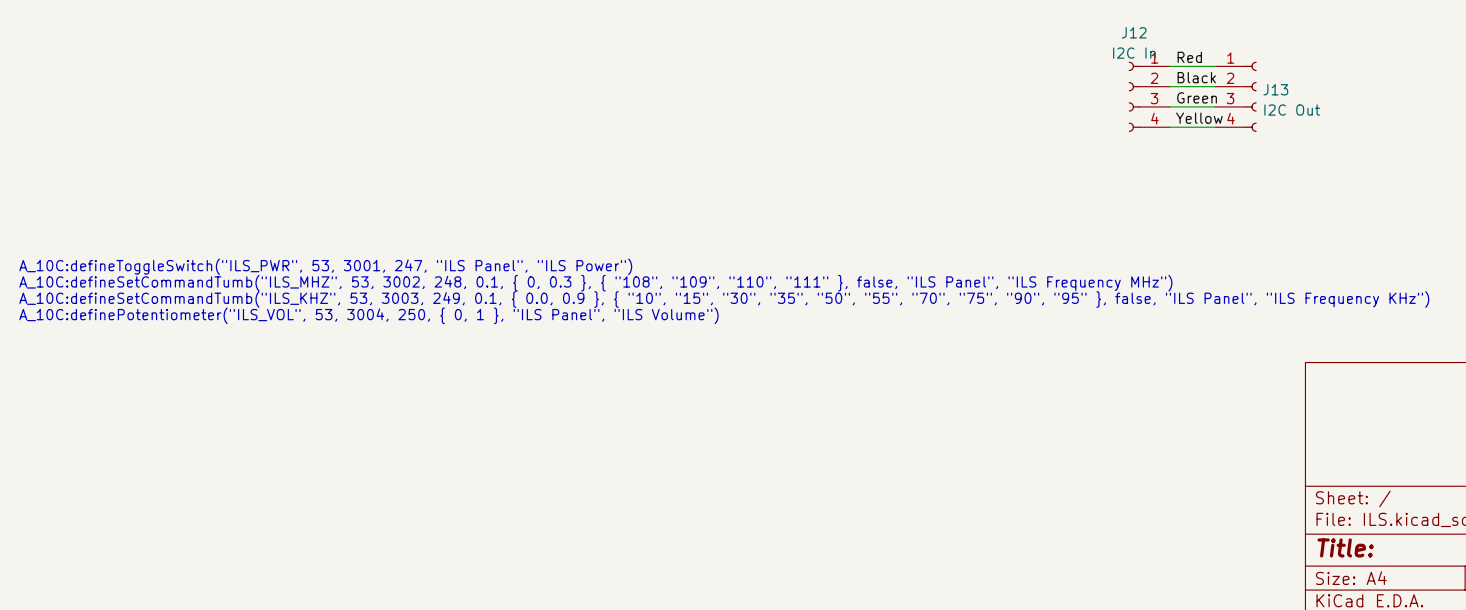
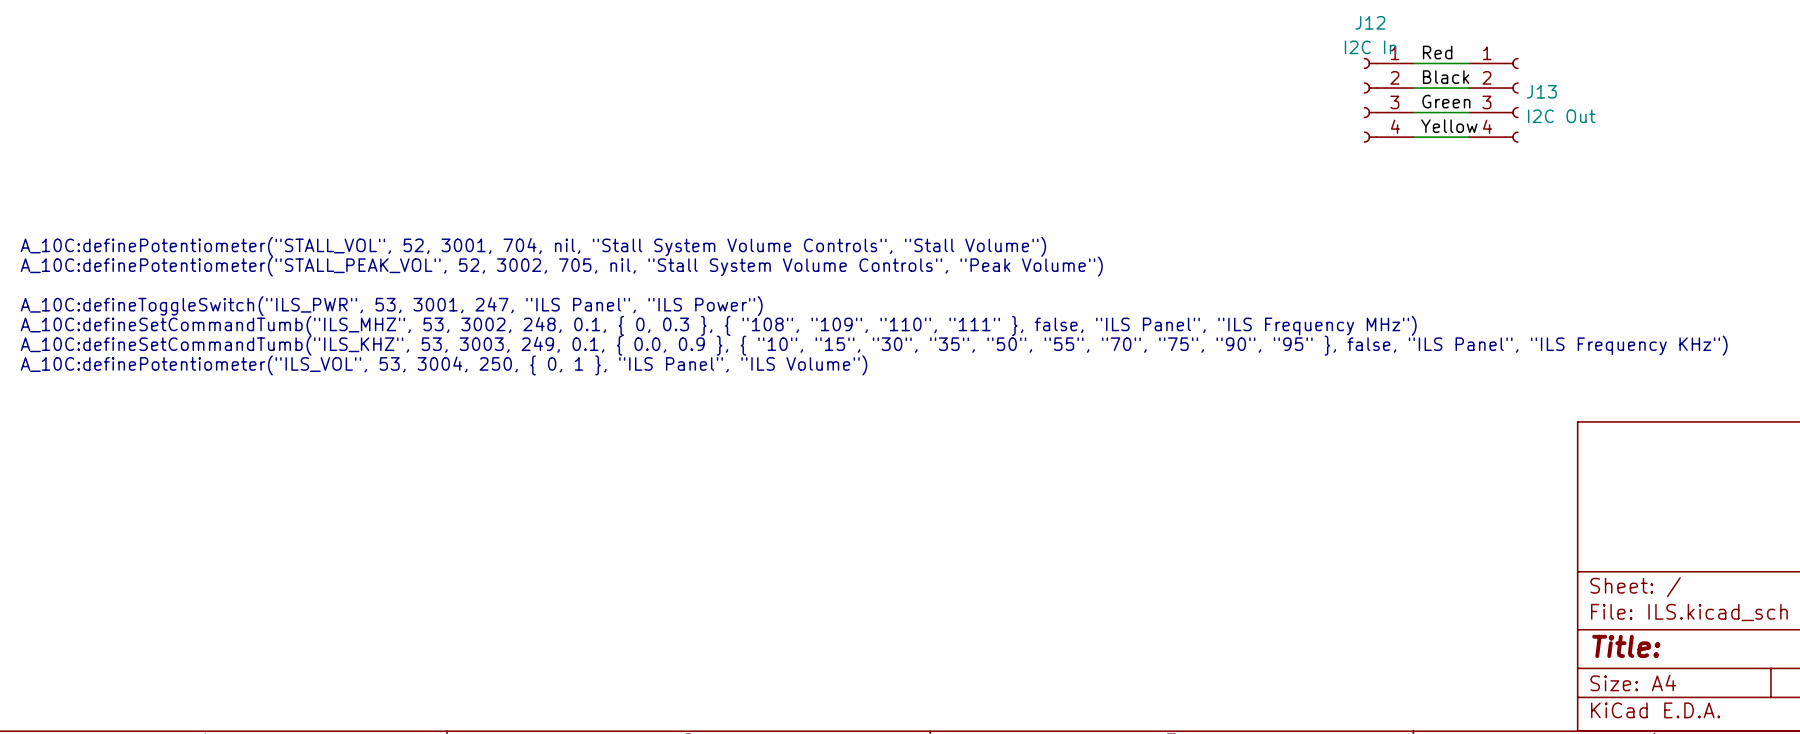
text: none -> A_10C:definePotentiometer("STALL_VOL", 52, 3001, 704, nil, "Stall System Volume Controls", "Stall Volume") (533, 246)
text: none -> A_10C:definePotentiometer("STALL_PEAK_VOL", 52, 3002, 705, nil, "Stall System Volume Controls", "Peak Volume") (561, 266)

